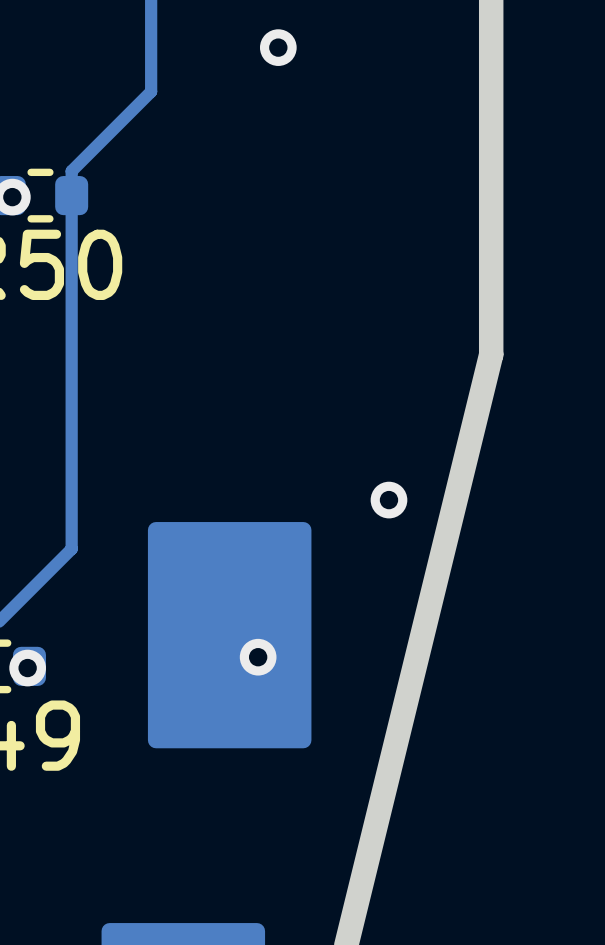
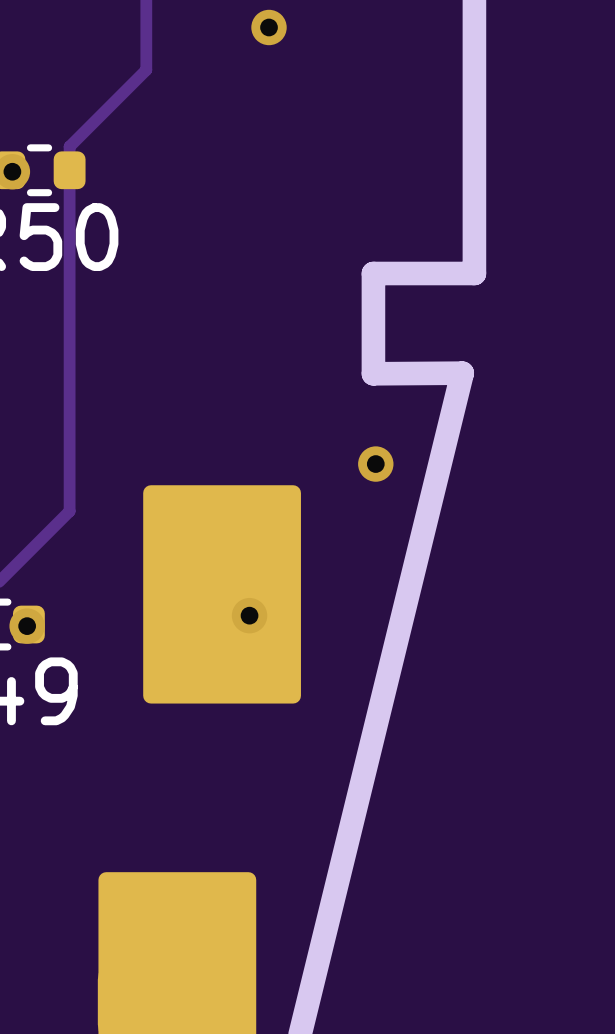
board edge: (491, 302) (491, 354) (478, 405) -> (474, 273) (373, 273) (373, 373) (462, 373)

